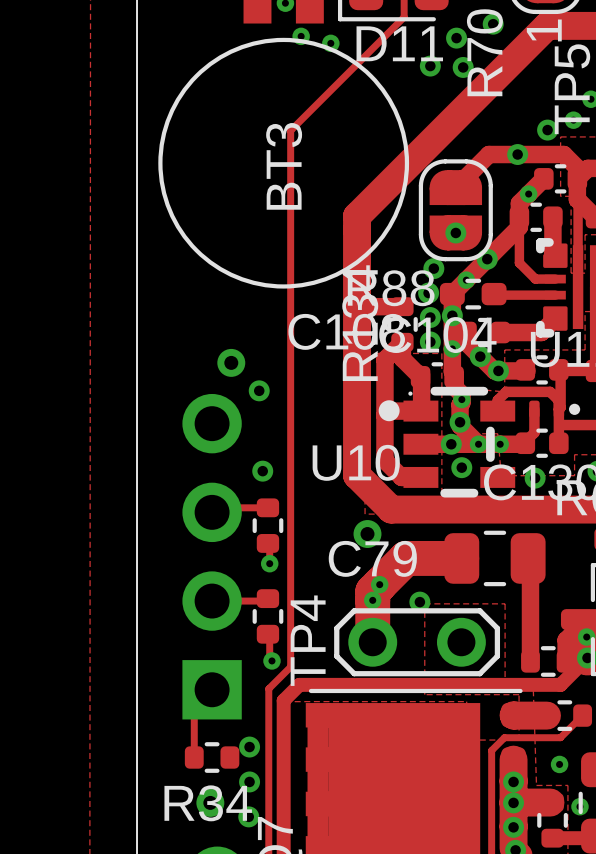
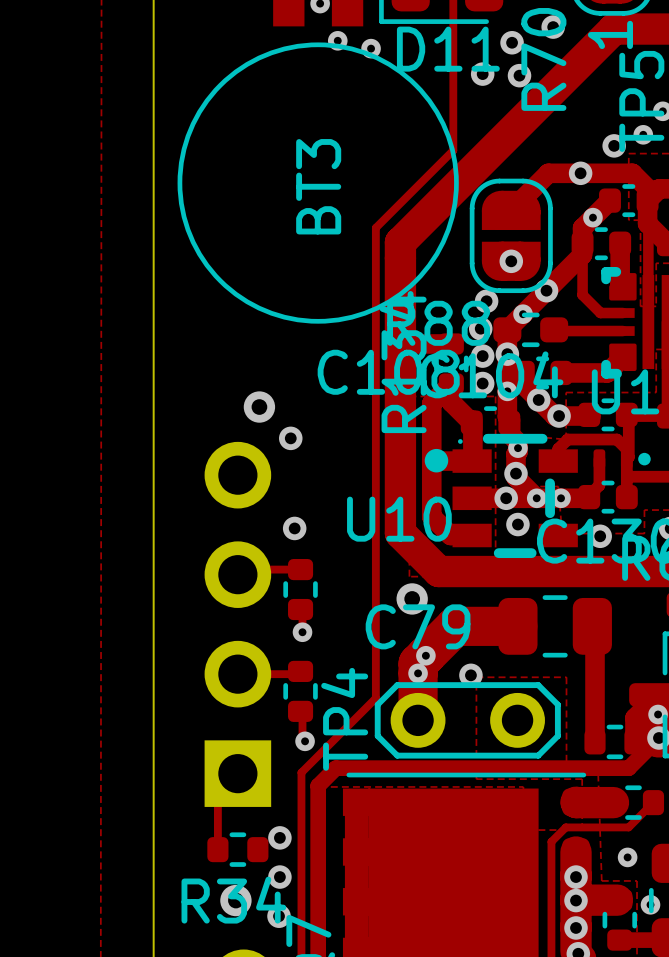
track: (404, 17) (290, 130) (290, 666) -> (453, 19) (453, 150) (375, 227) (375, 698) (326, 748)

